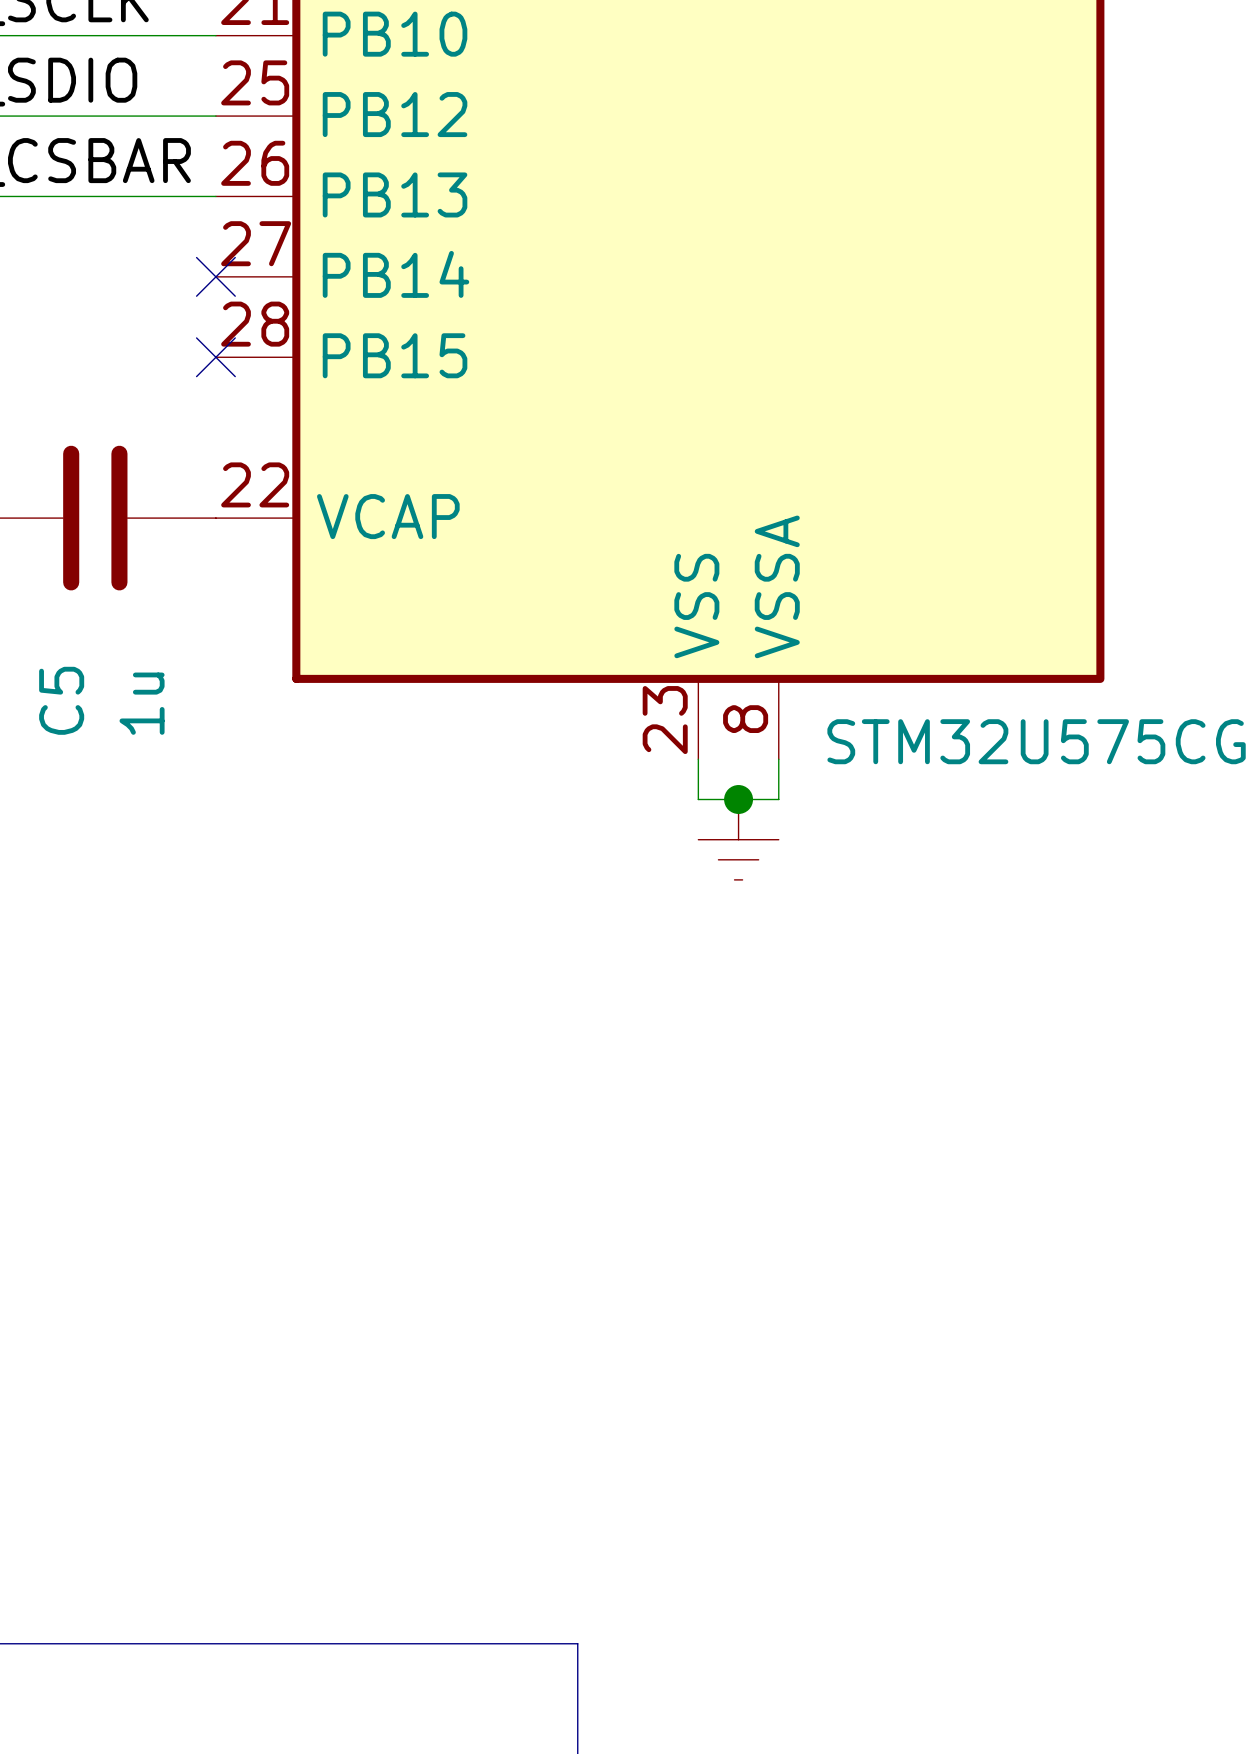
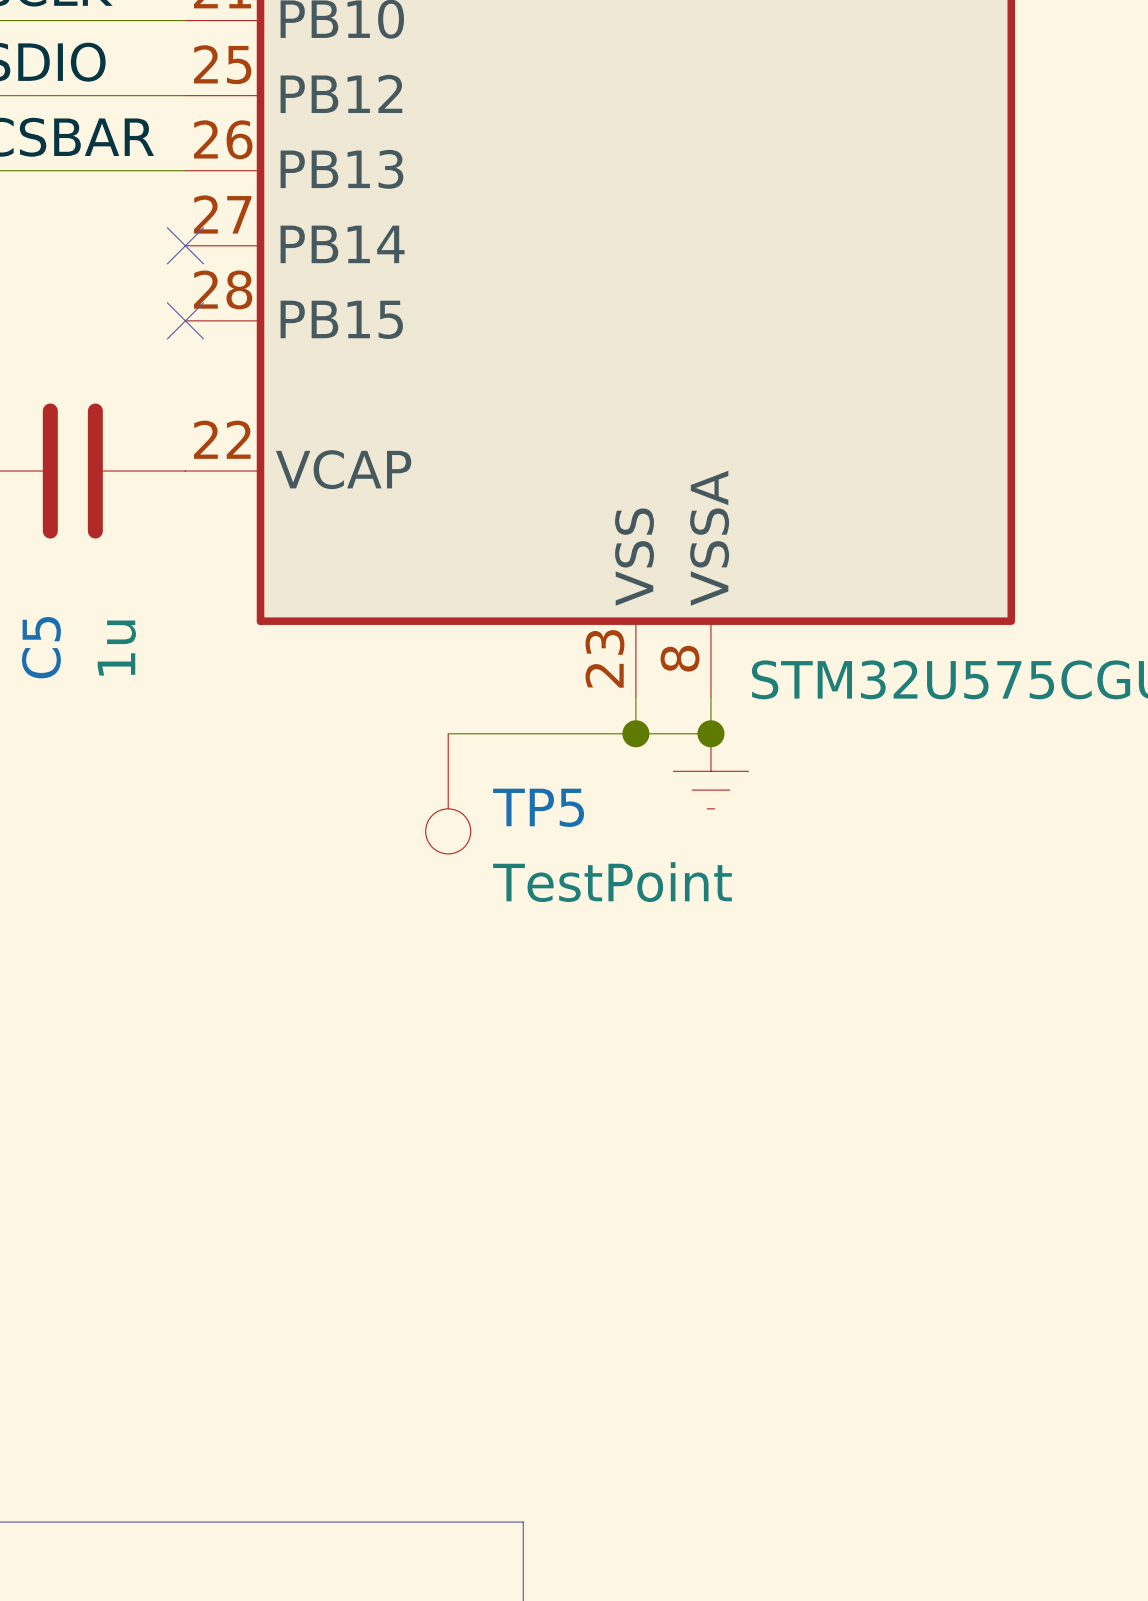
wire: none -> (448, 733) (635, 733)
junction: none -> (635, 733)
junction: (738, 799) -> none
junction: none -> (710, 733)
power symbol position: (738, 839) -> (710, 771)
TP5: none -> TestPoint (448, 793)

